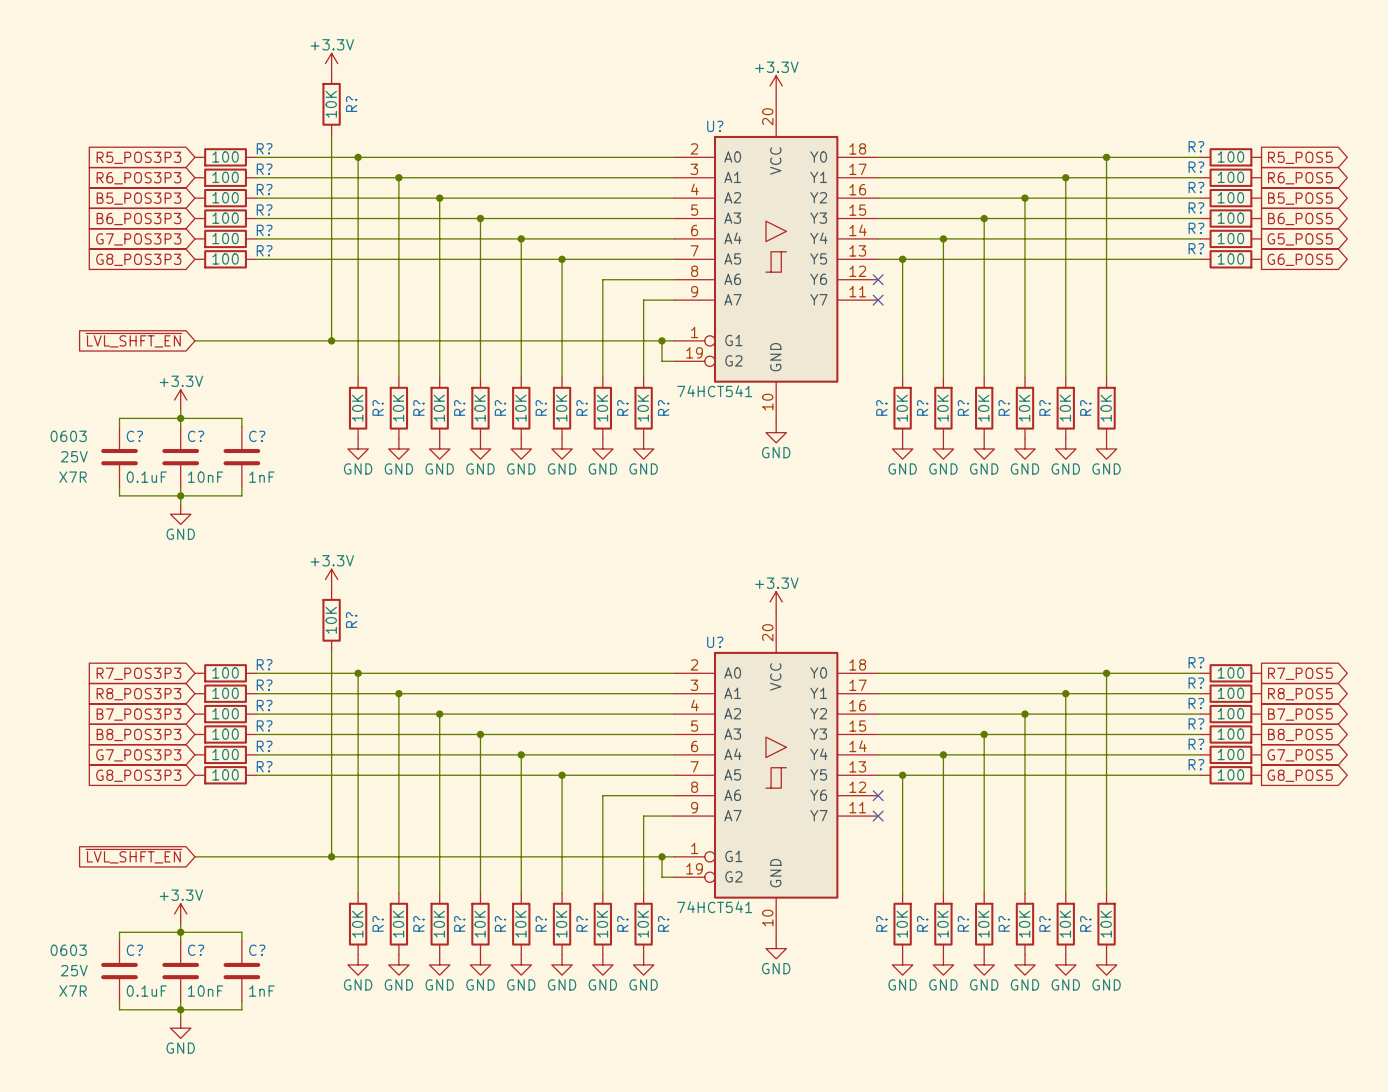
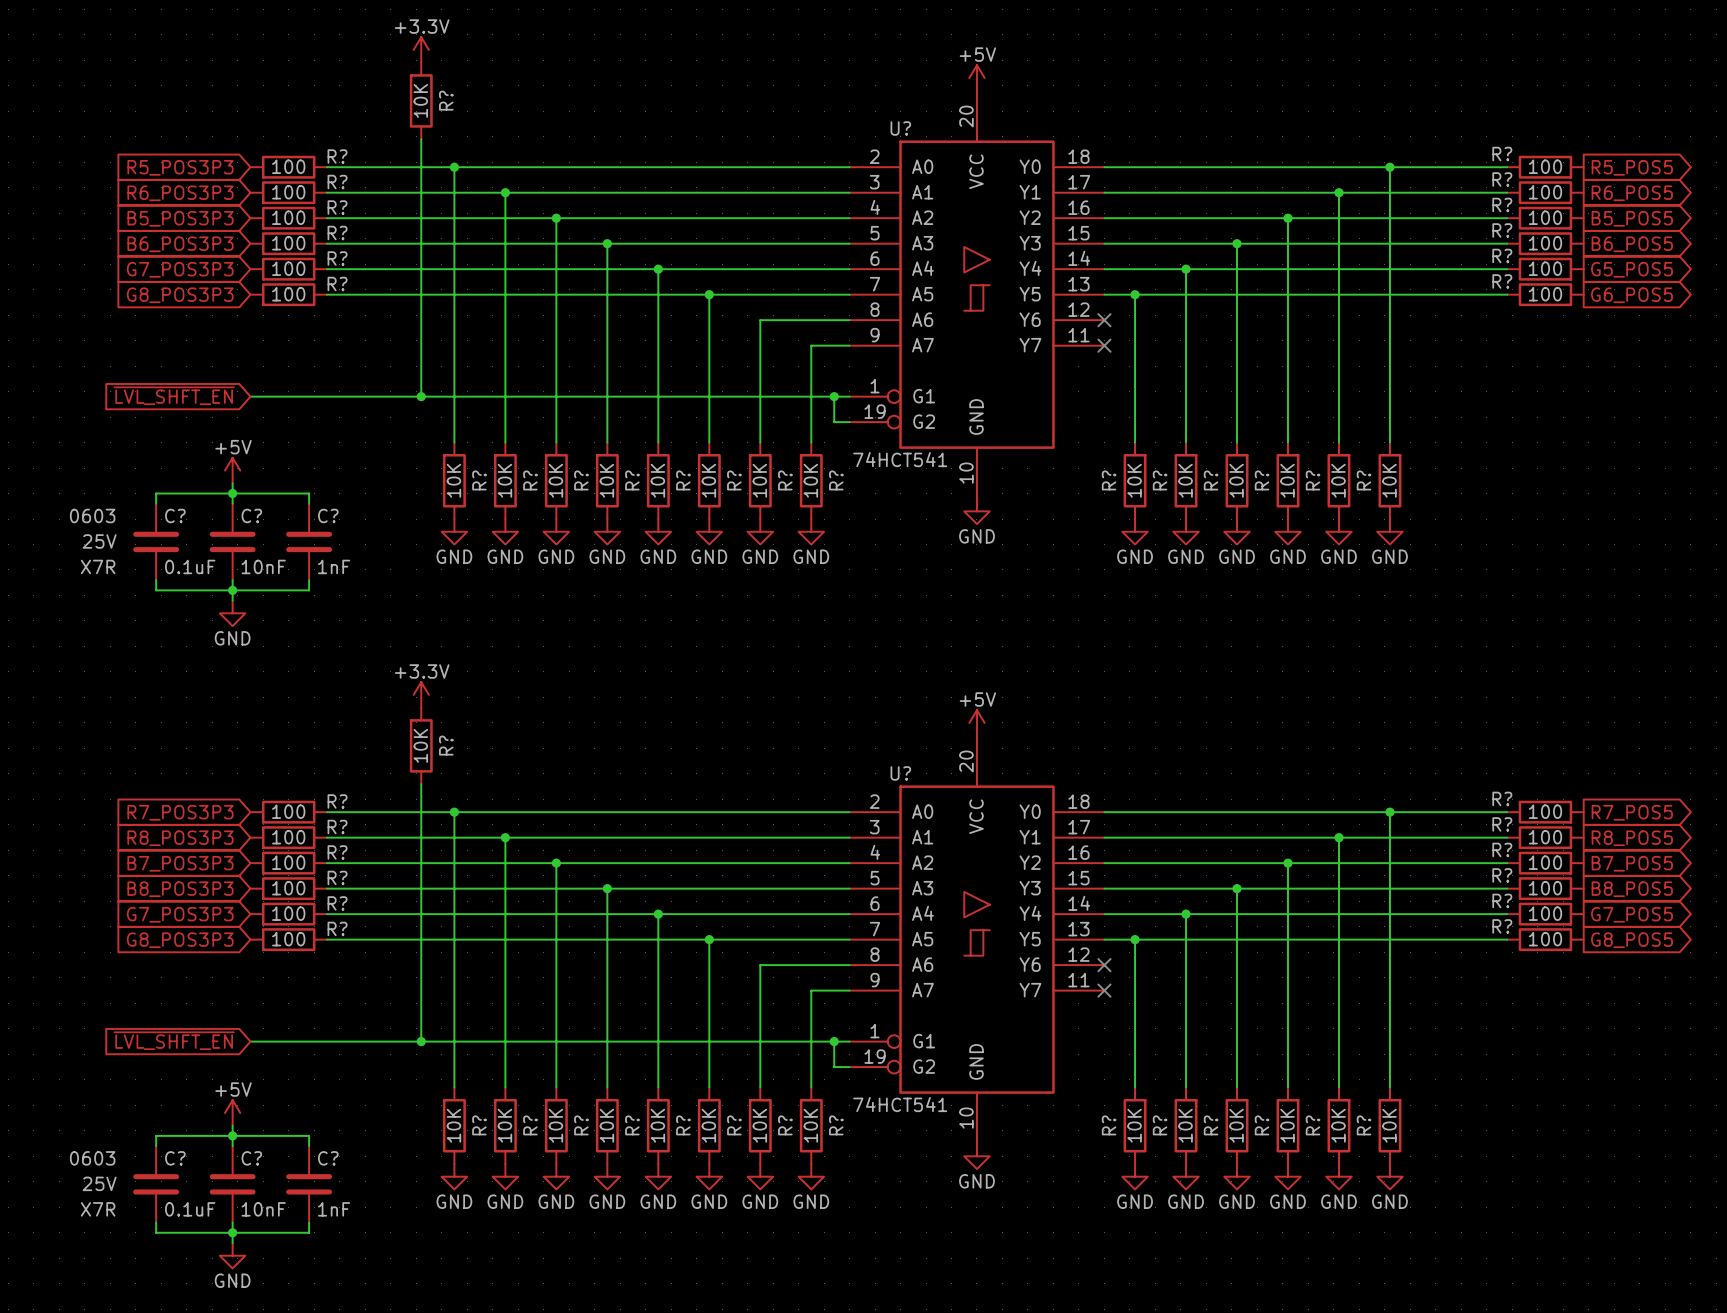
power symbol: +3.3V (776, 85) -> +5V (976, 77)
power symbol: +3.3V (180, 400) -> +5V (232, 470)
power symbol: +3.3V (776, 601) -> +5V (976, 722)
power symbol: +3.3V (180, 913) -> +5V (232, 1112)

